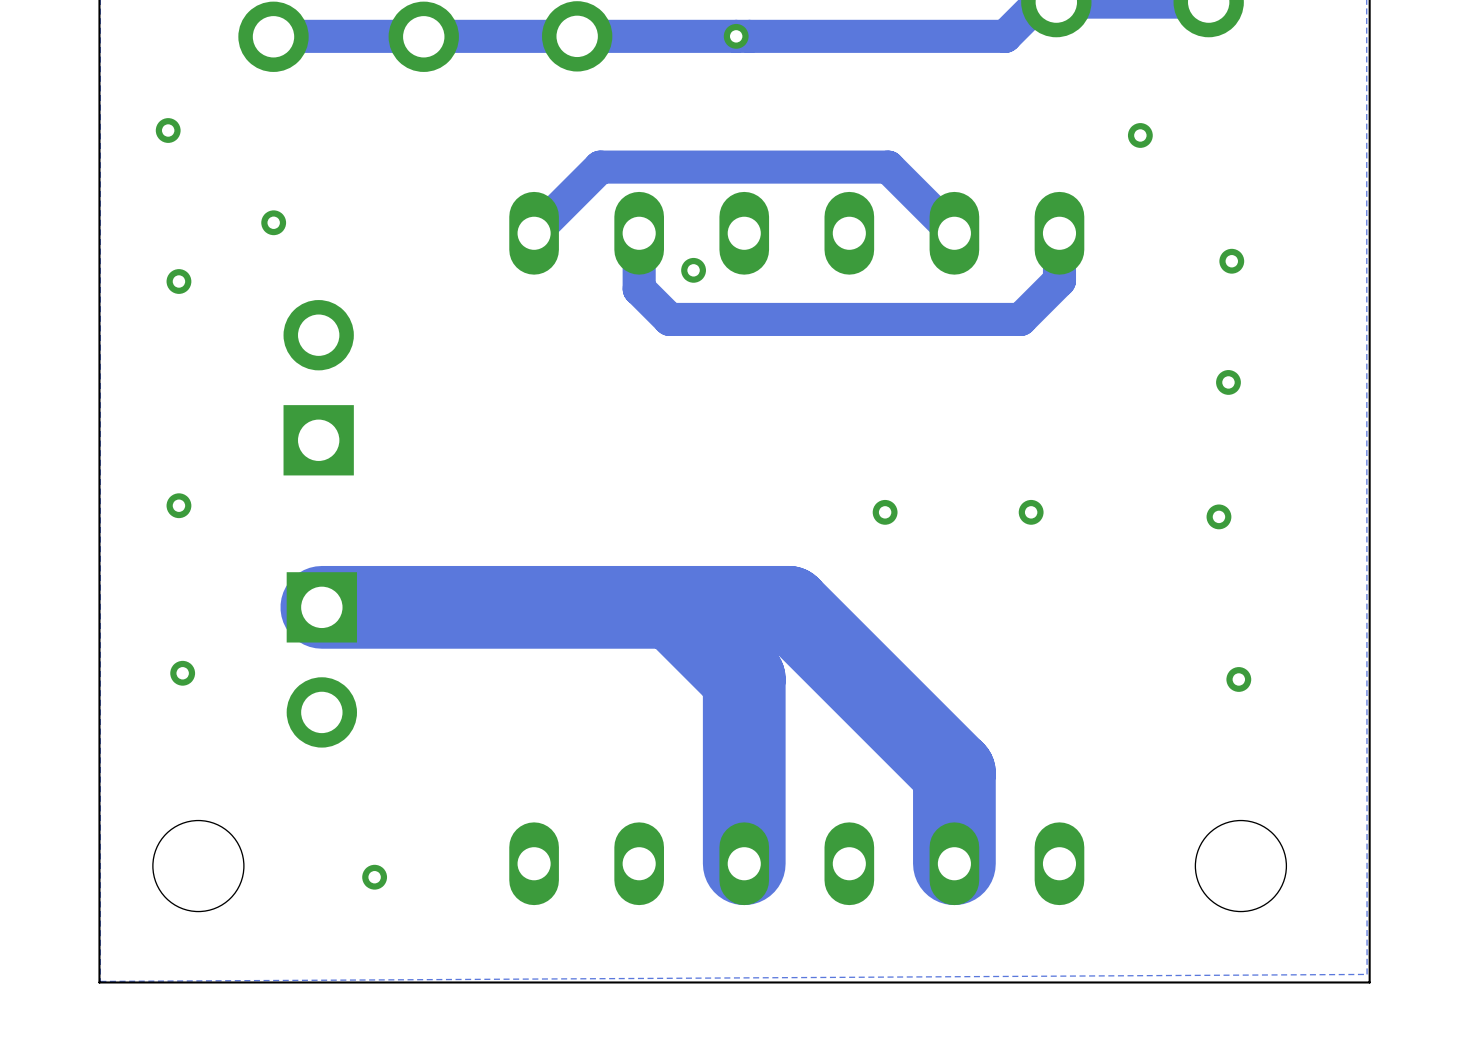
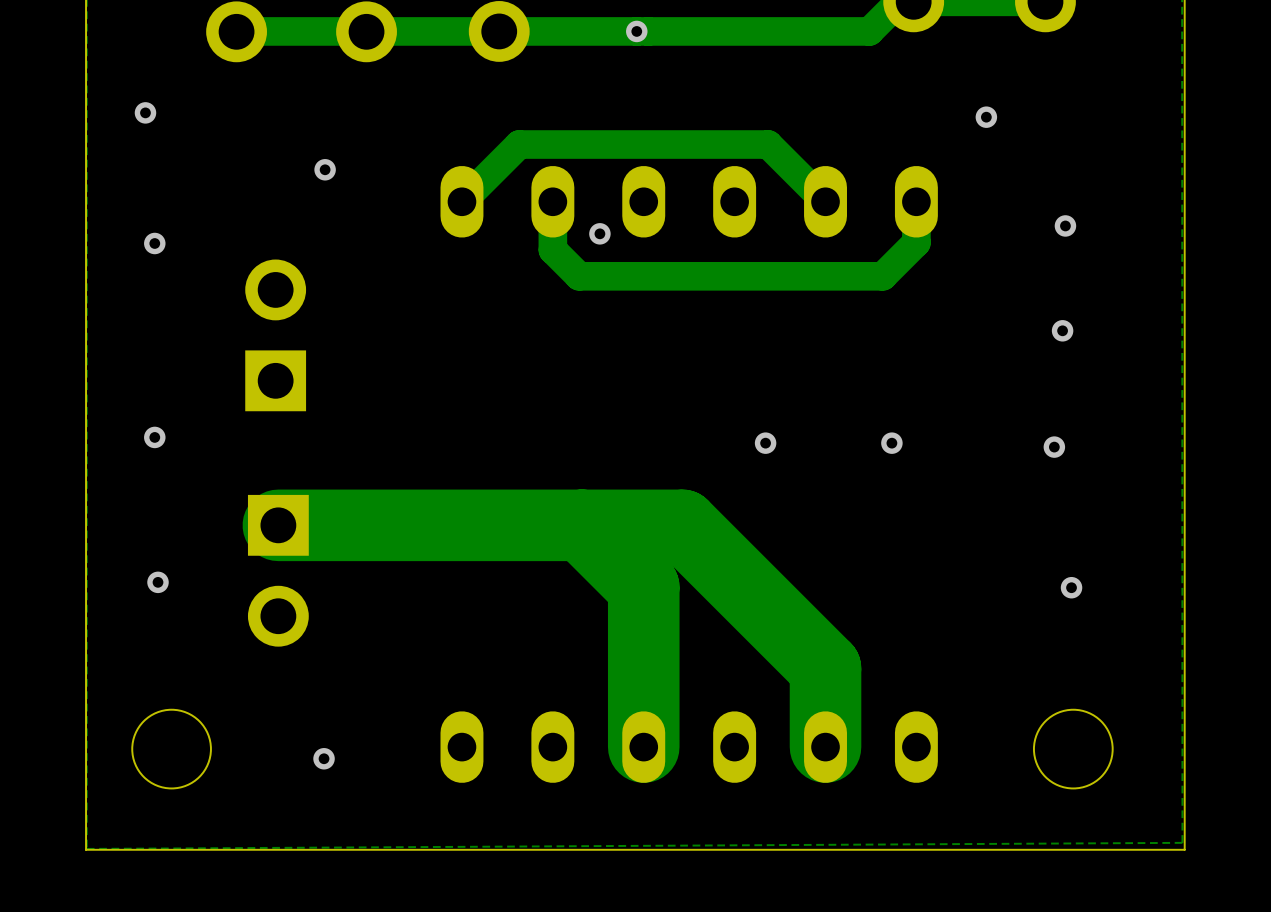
via position: (273, 222) -> (325, 169)

